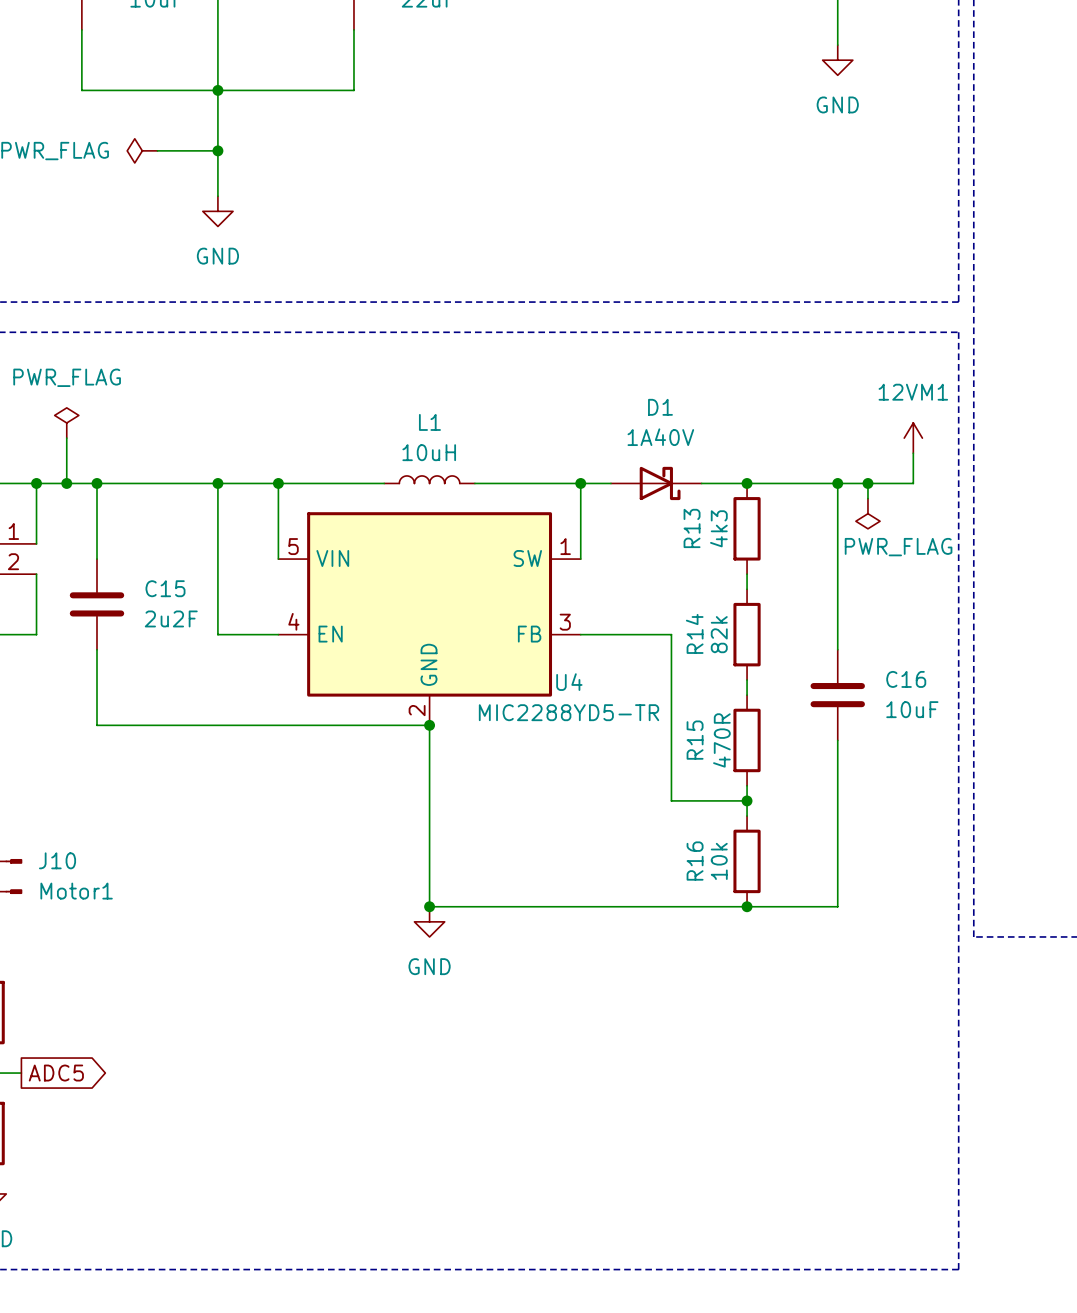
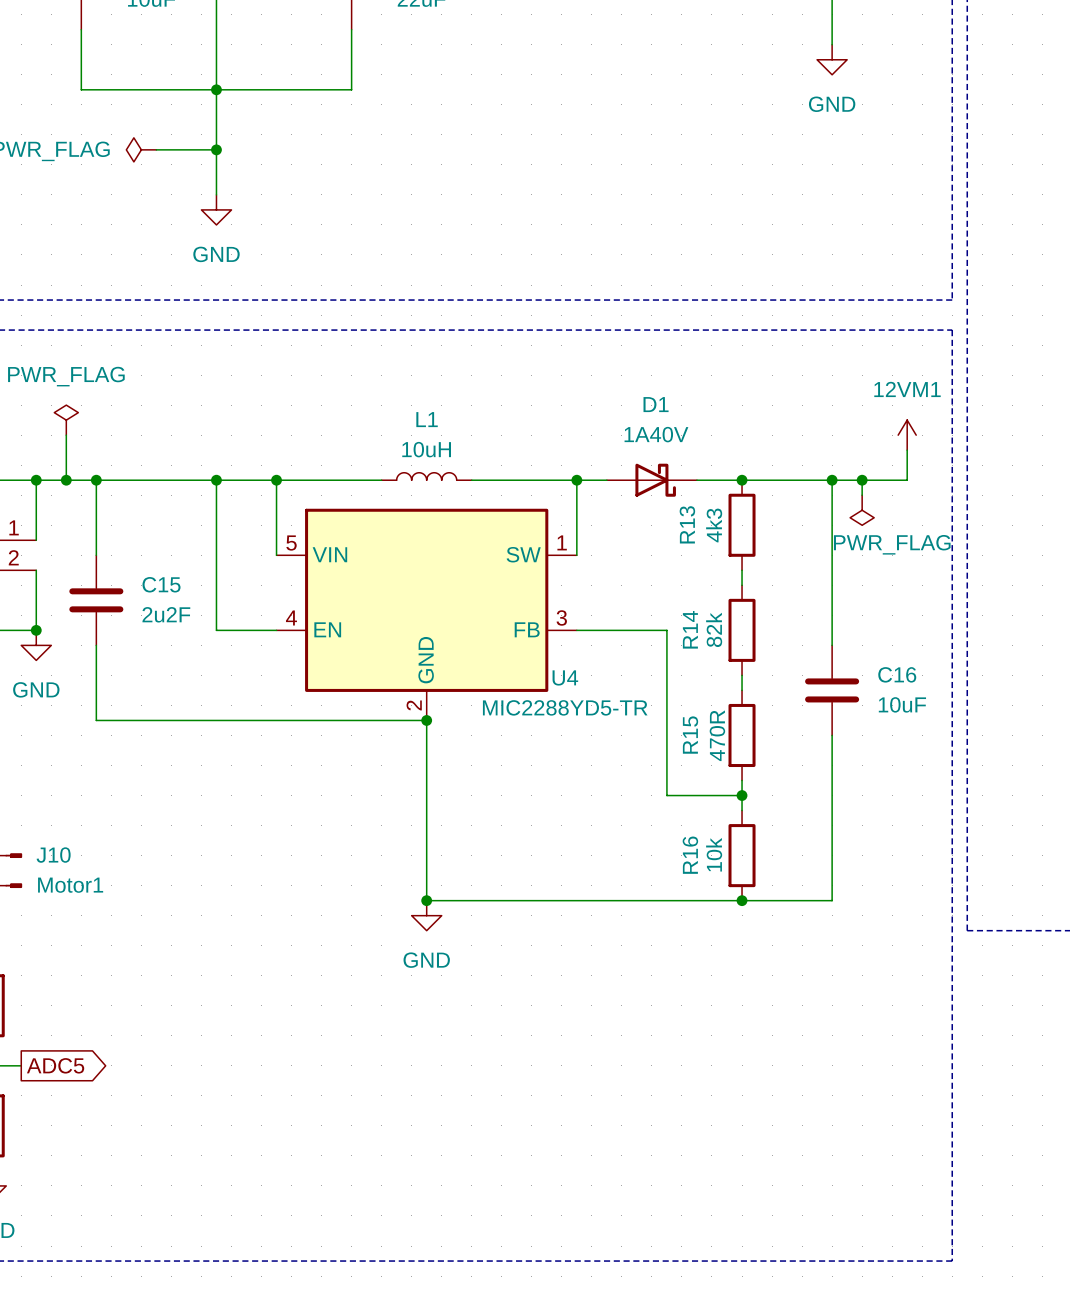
junction: none -> (36, 630)
power symbol: none -> GND (36, 645)

